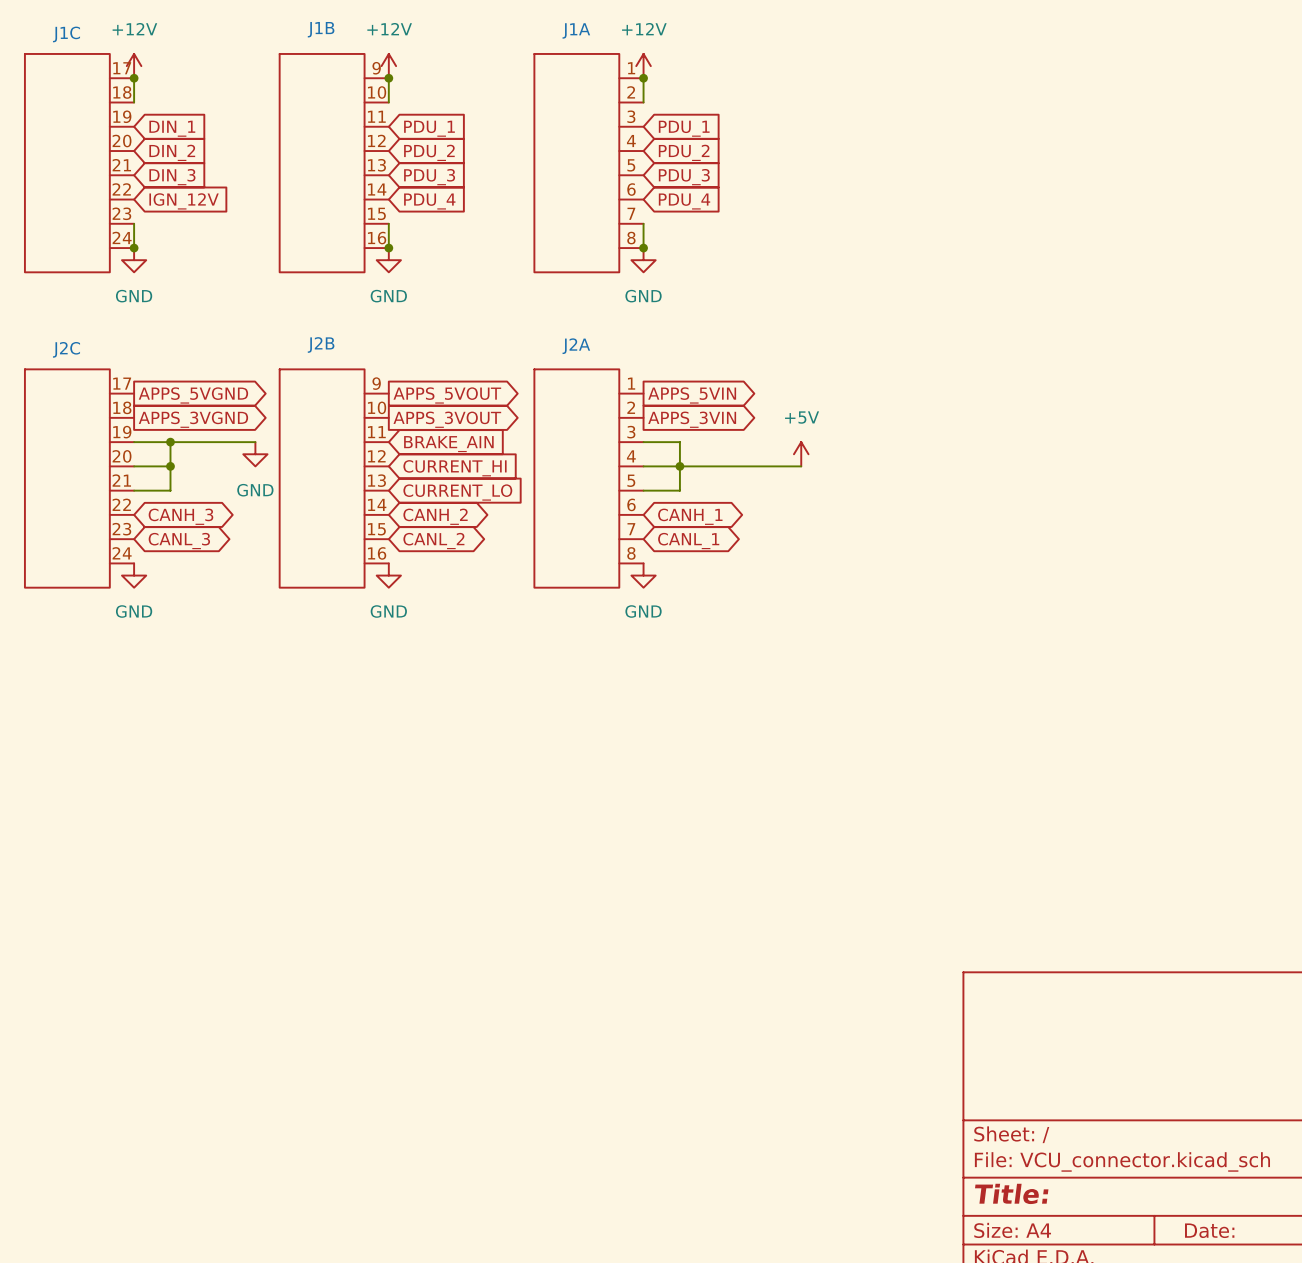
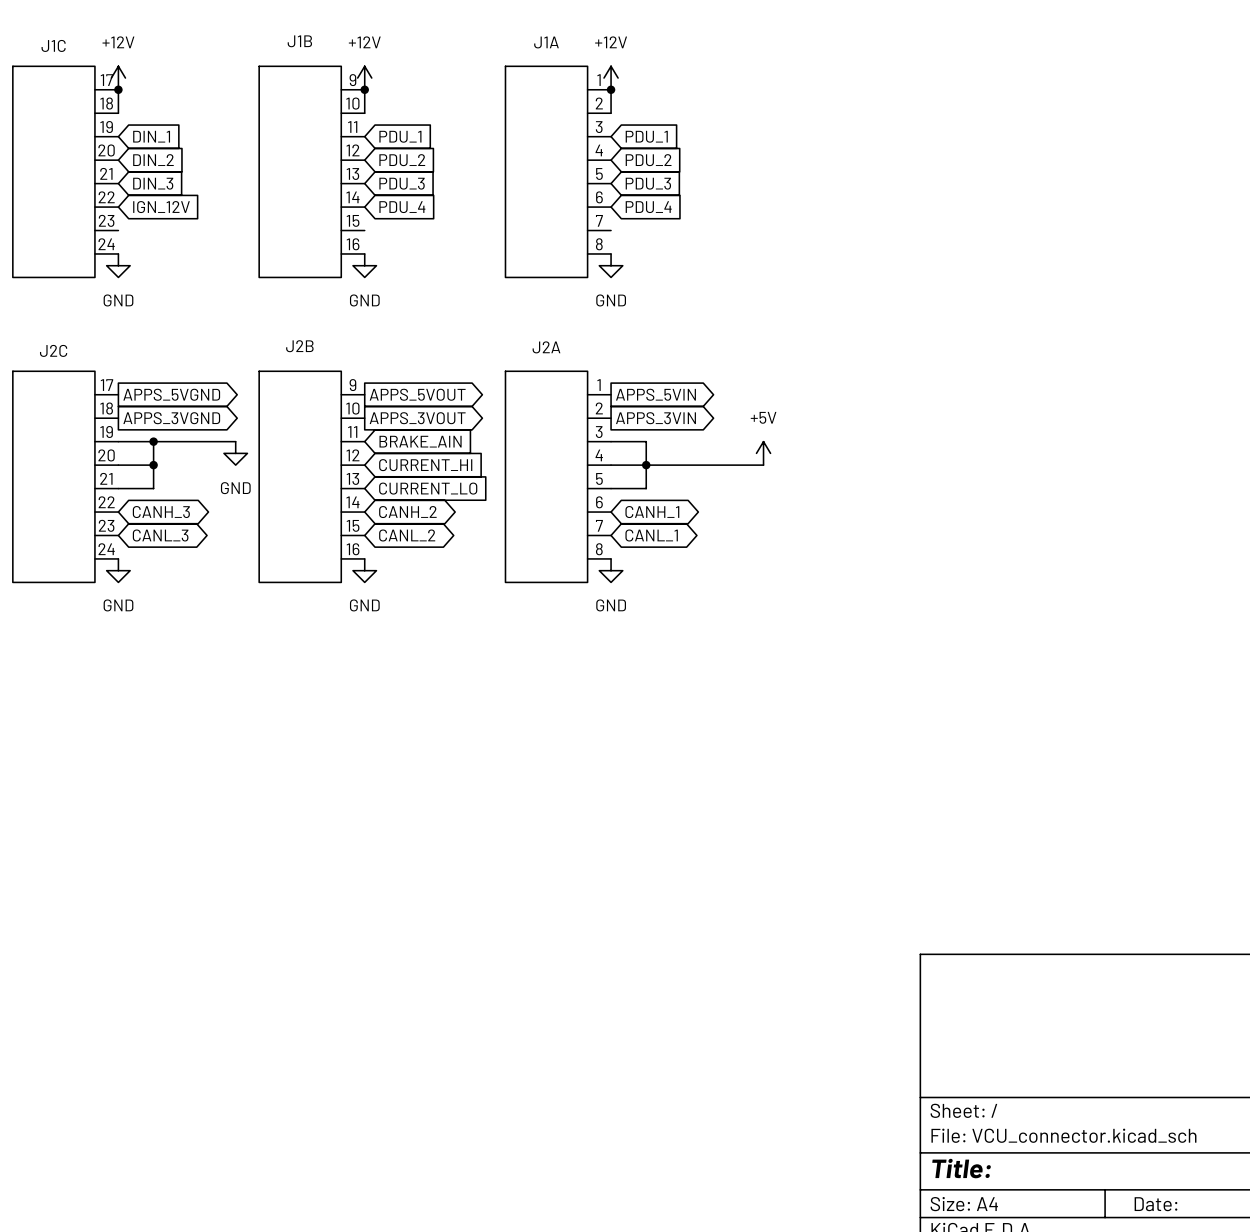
wire: (134, 223) (134, 248) -> none
wire: (388, 223) (388, 248) -> none
wire: (643, 223) (643, 248) -> none
junction: (134, 248) -> none
junction: (388, 248) -> none
junction: (643, 248) -> none

